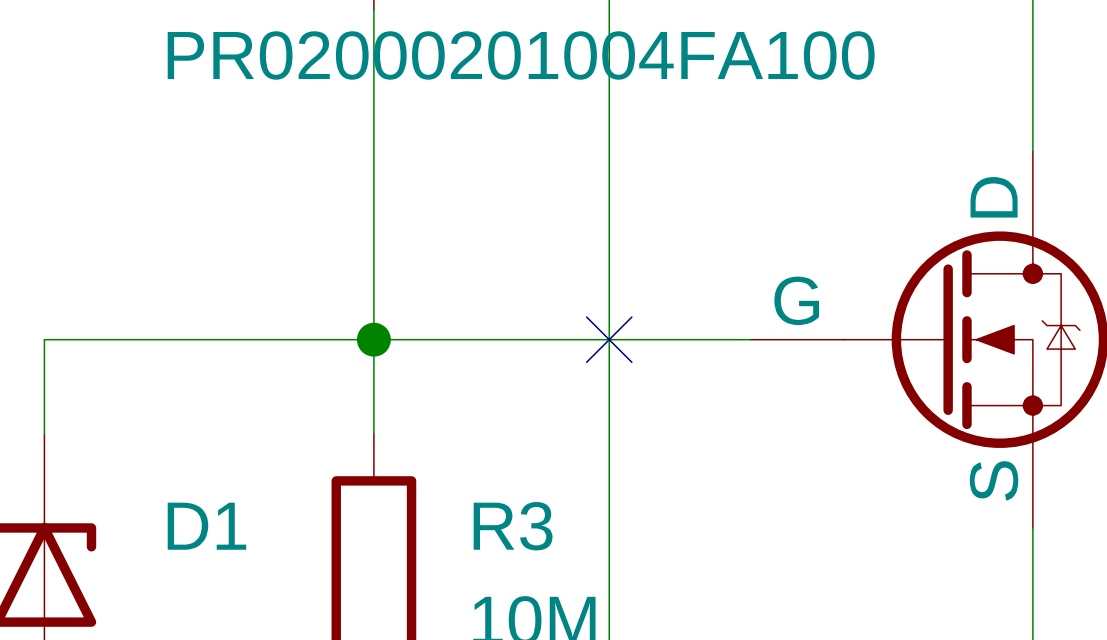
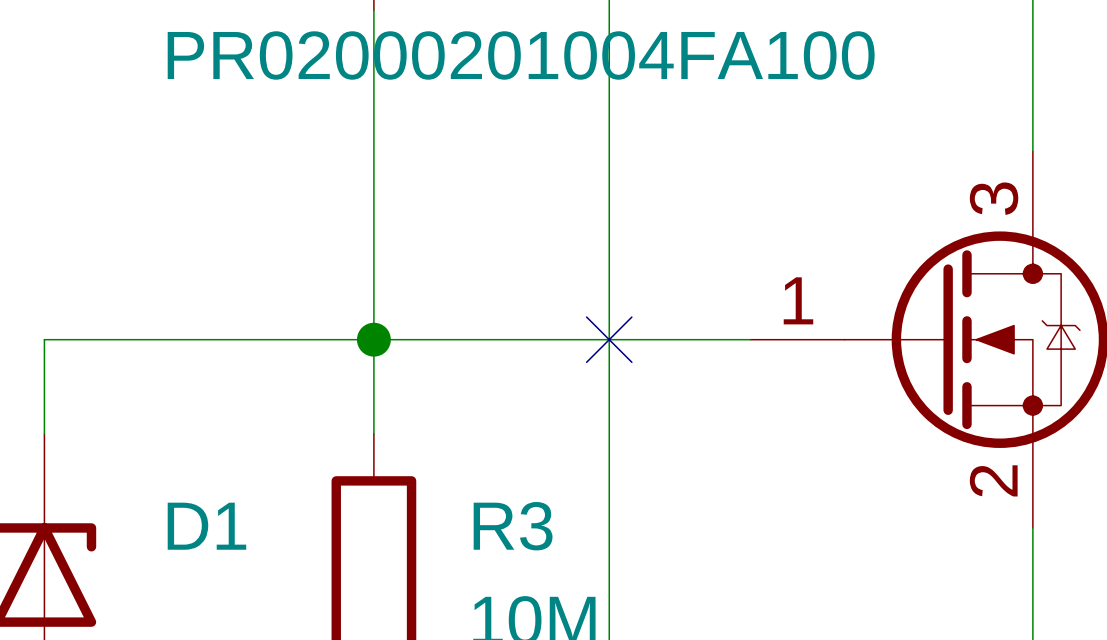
part pin name: D (994, 197) -> none
part pin number: none -> 3 (994, 198)
part pin name: G (796, 300) -> none
part pin number: none -> 1 (798, 300)
part pin number: none -> 2 (993, 480)
part pin name: S (994, 480) -> none

